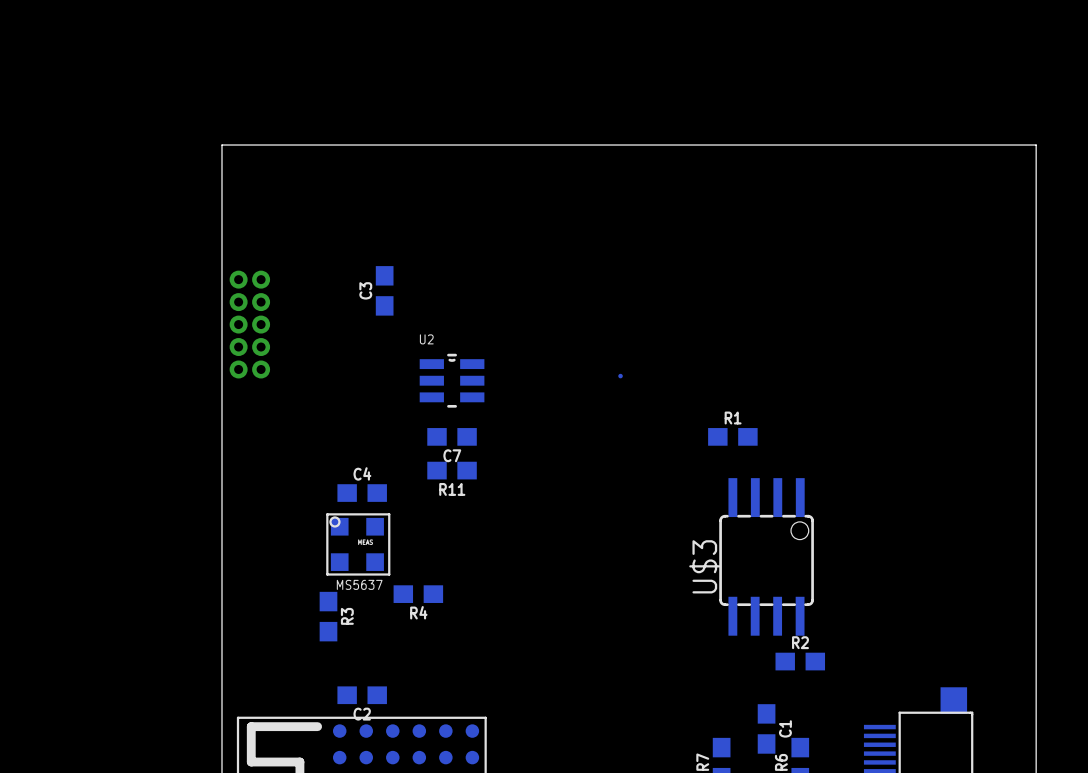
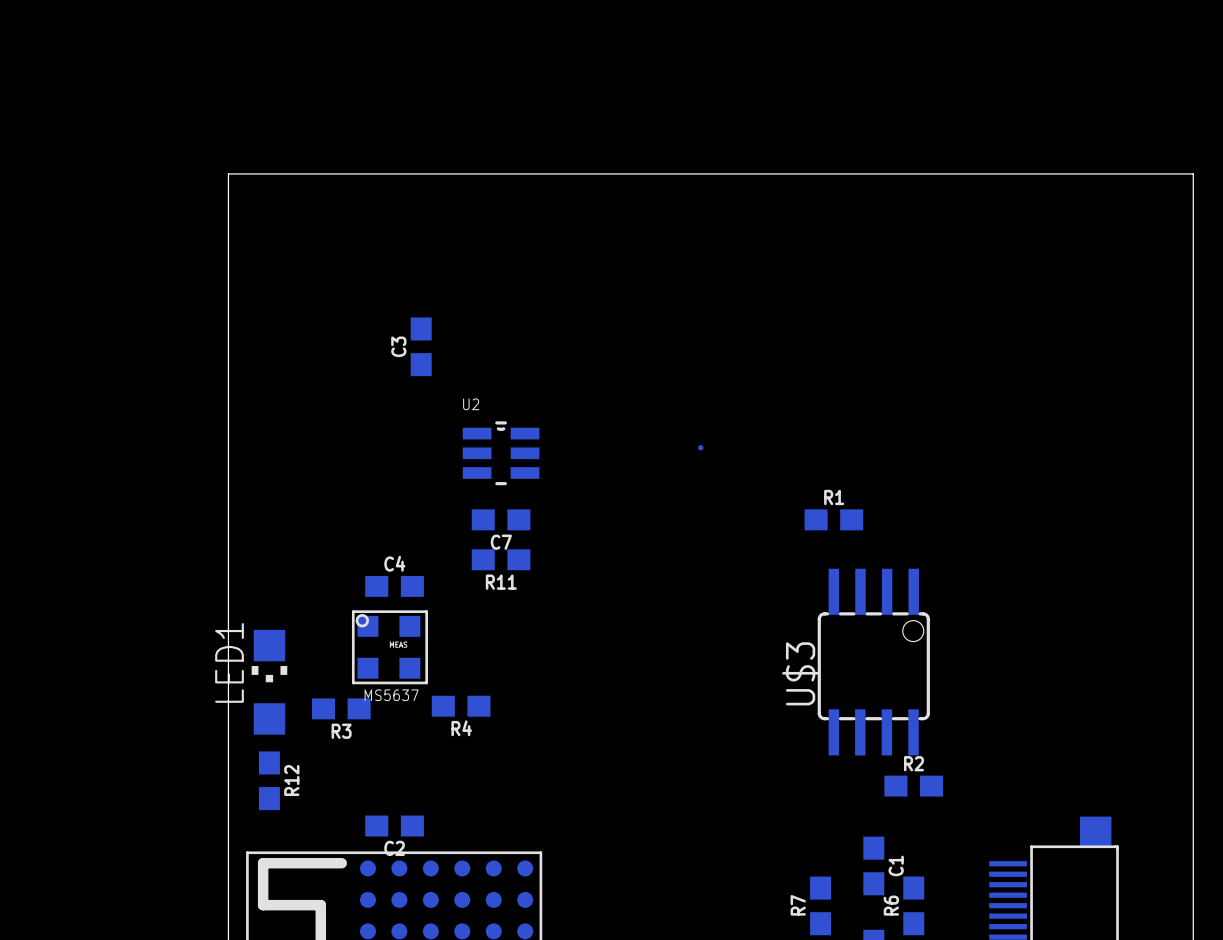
part: (249, 324) -> none
LED1: none -> (269, 682)
R3 rotation: 0° (328, 616) -> 90° clockwise (341, 708)
R12: none -> (269, 780)

